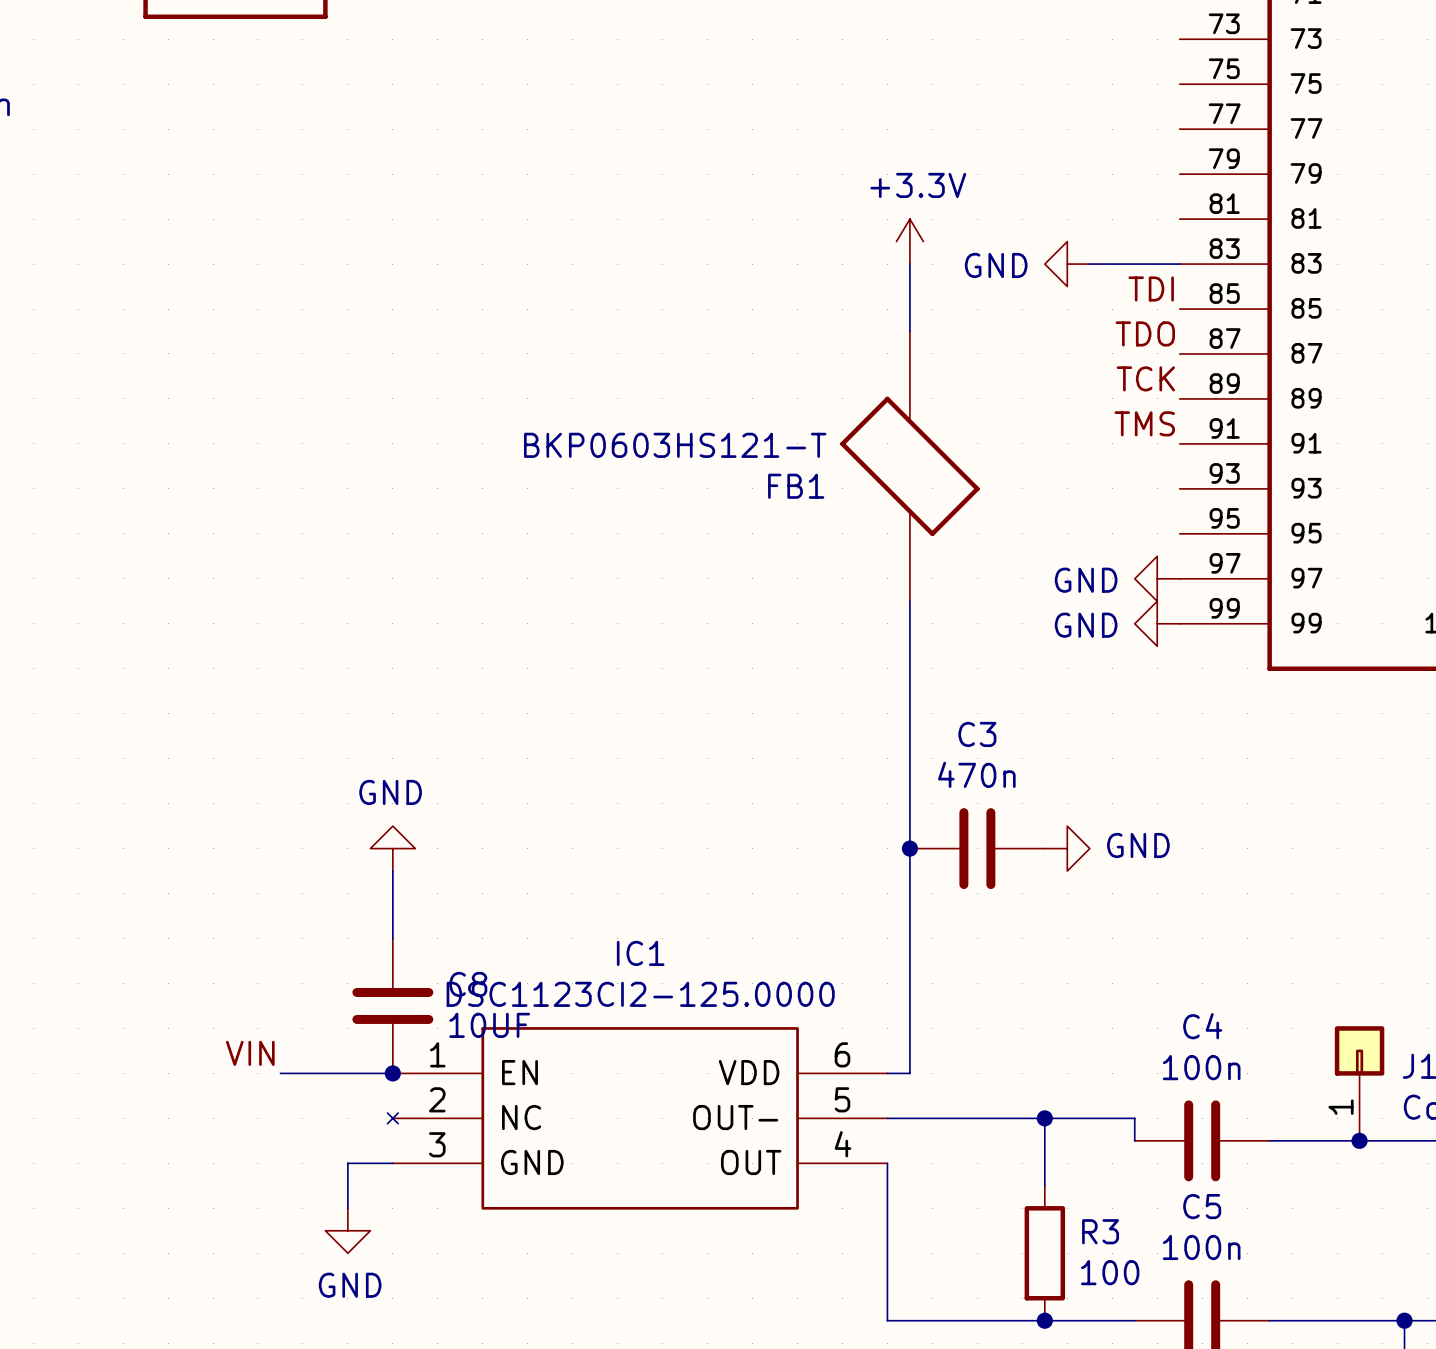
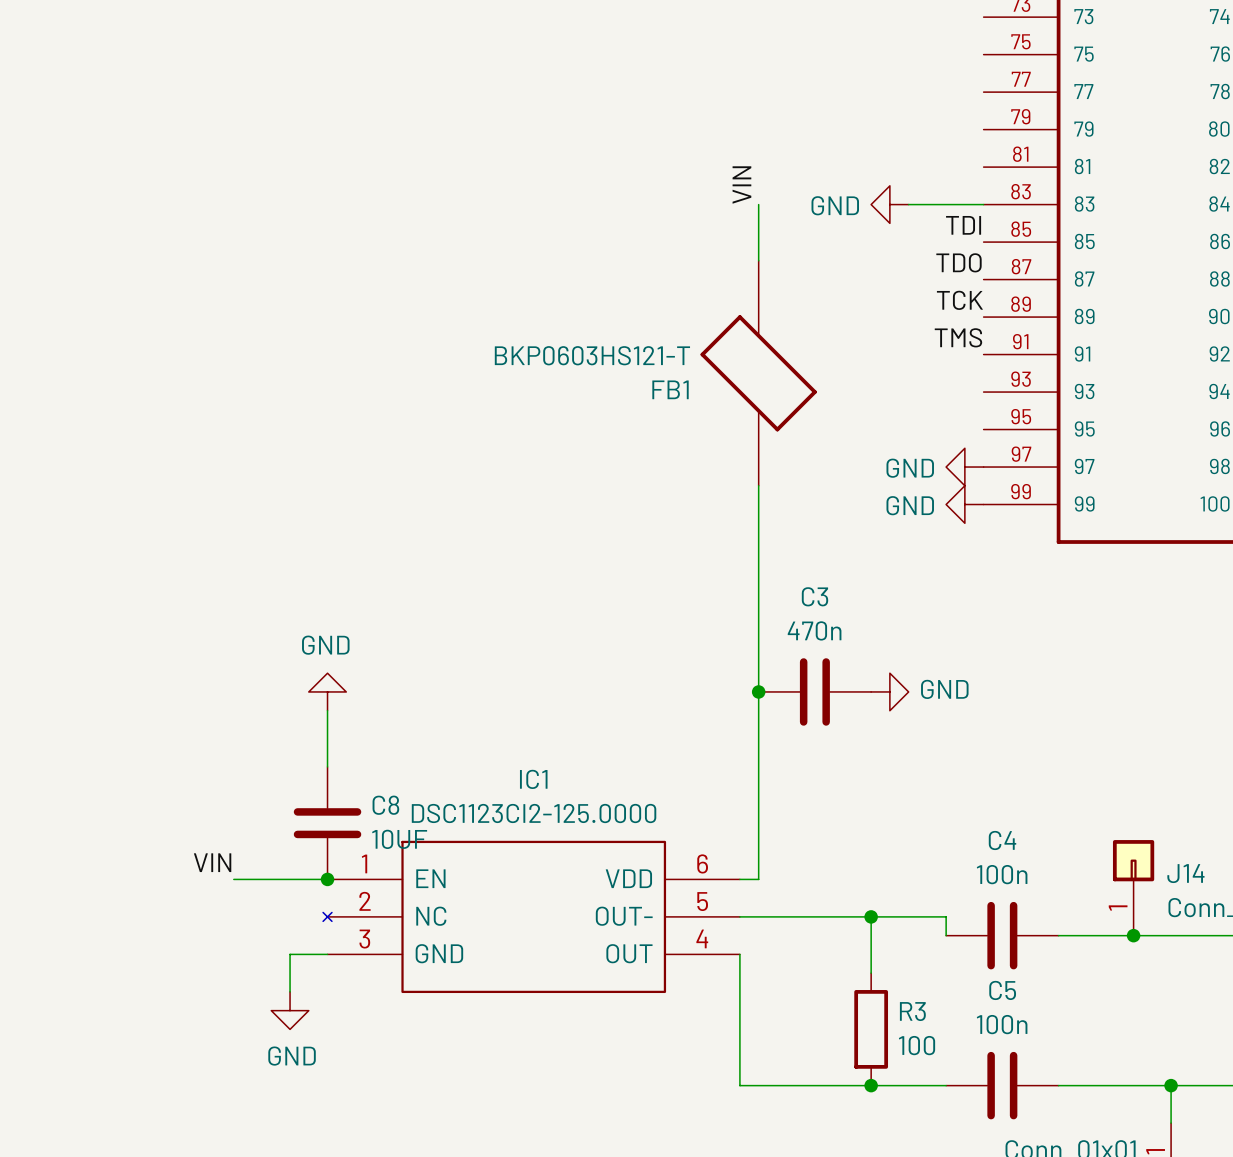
label: none -> VIN (741, 184)
power symbol: +3.3V (909, 241) -> none

